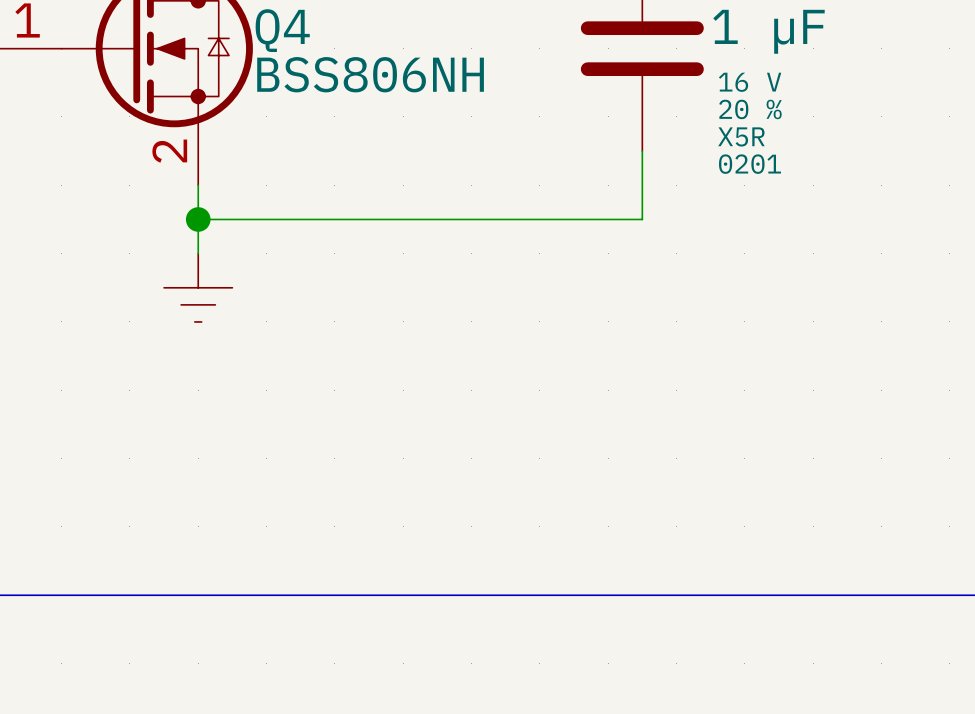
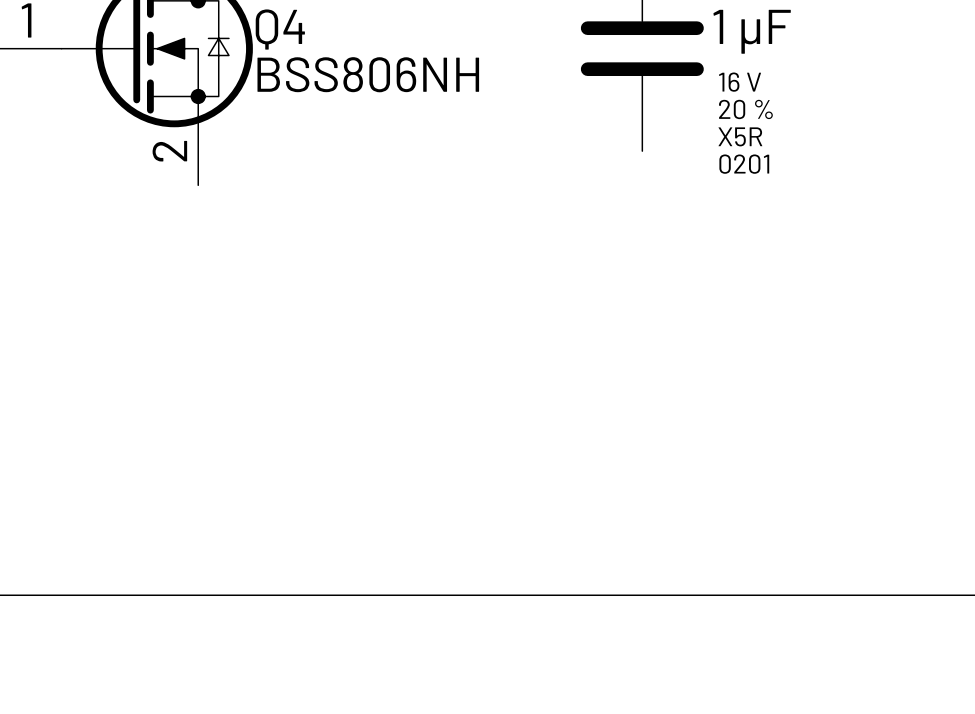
wire: (642, 151) (642, 219) (198, 219) -> none
wire: (198, 185) (198, 253) -> none
junction: (198, 219) -> none
power symbol: (198, 287) -> none

